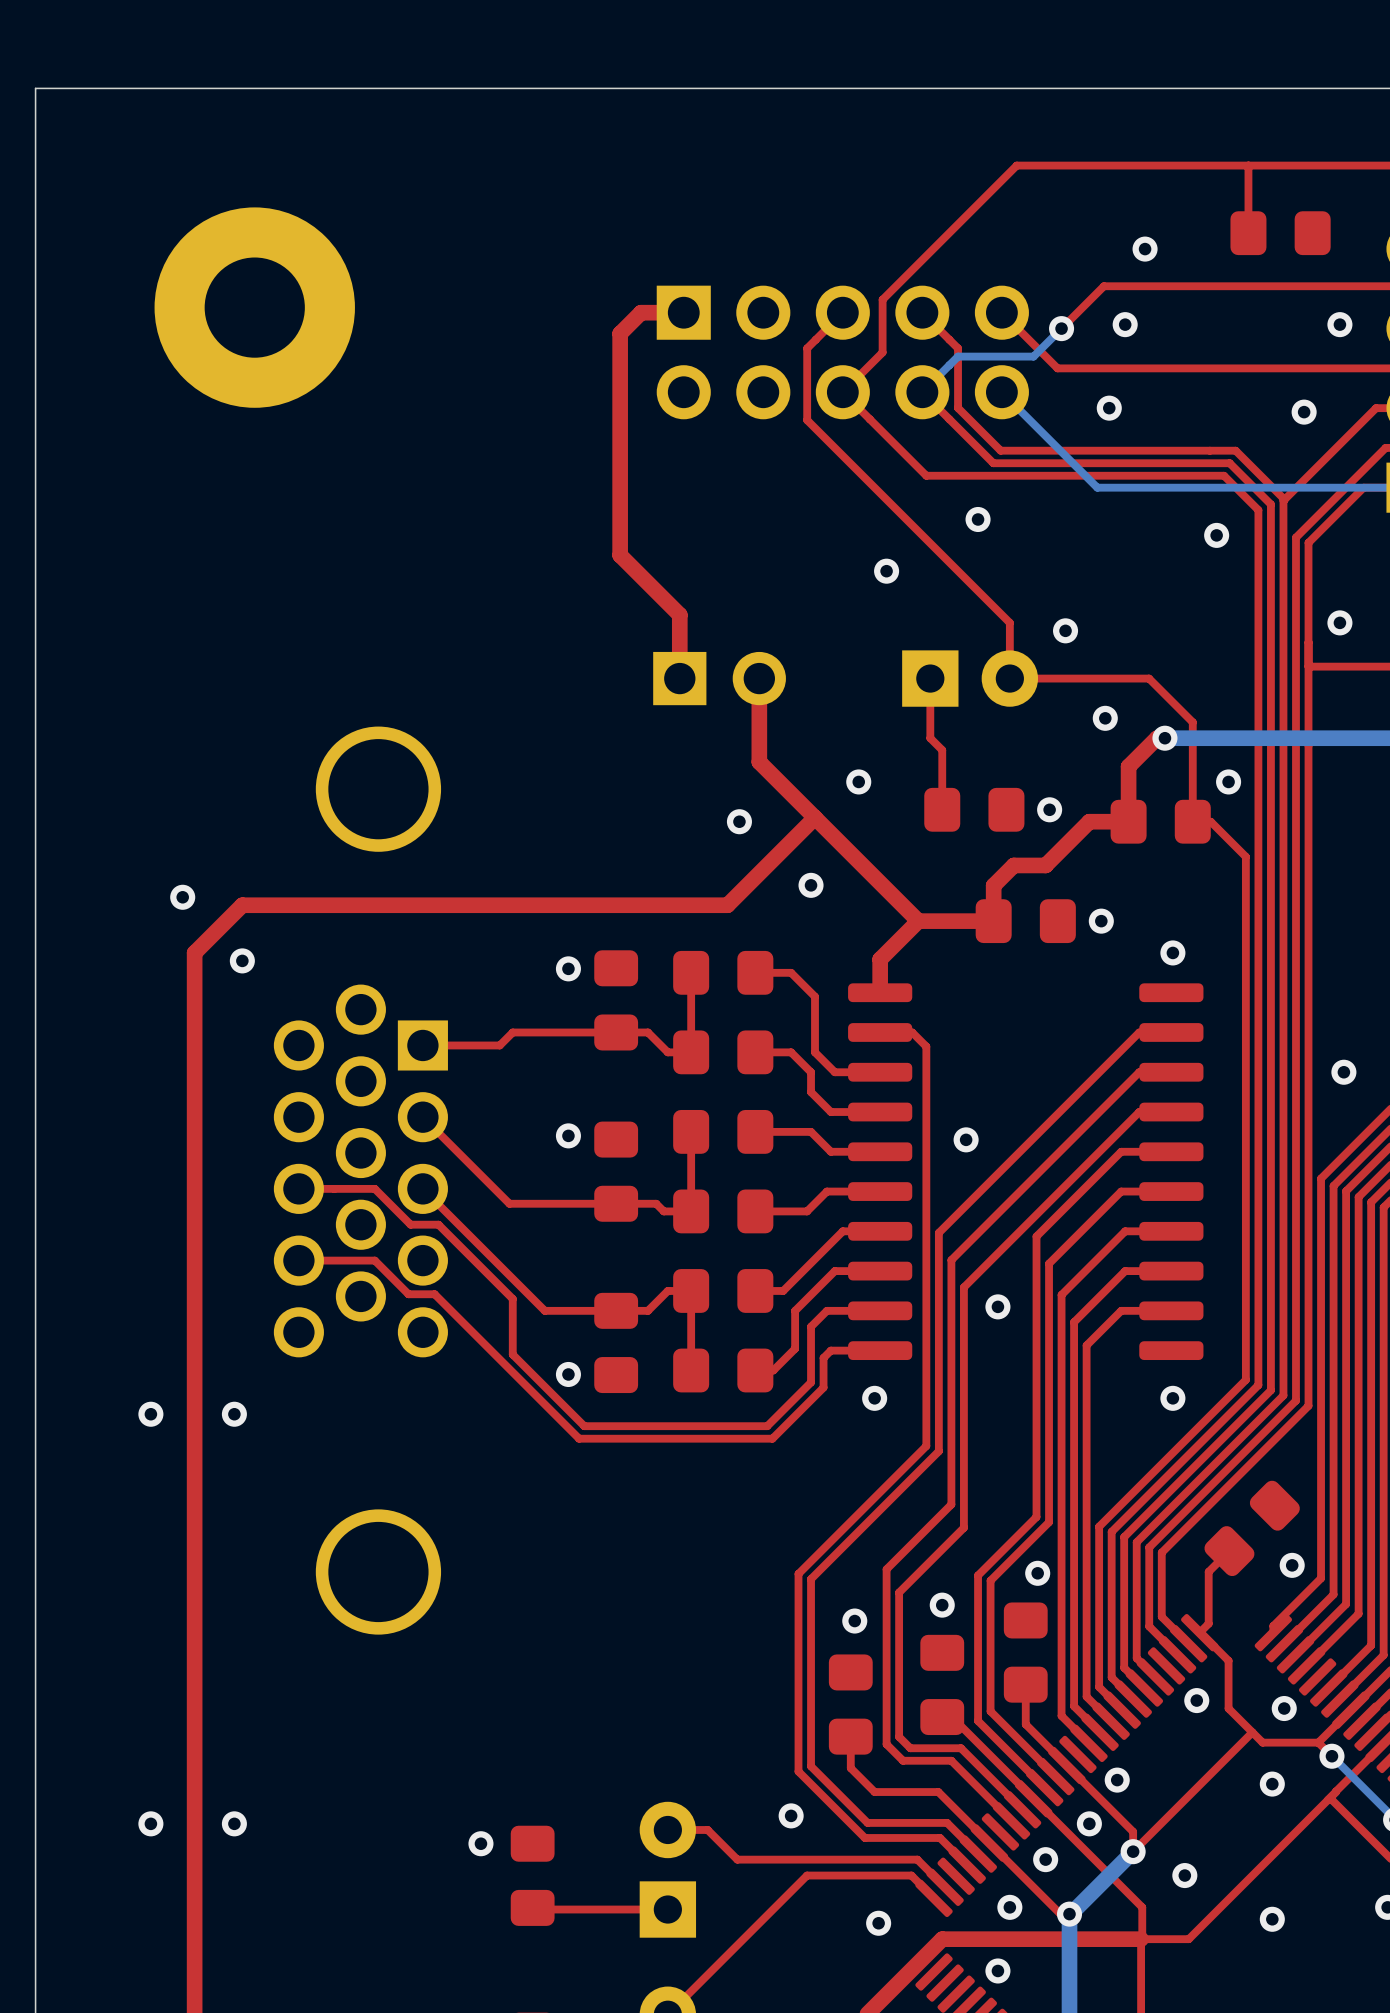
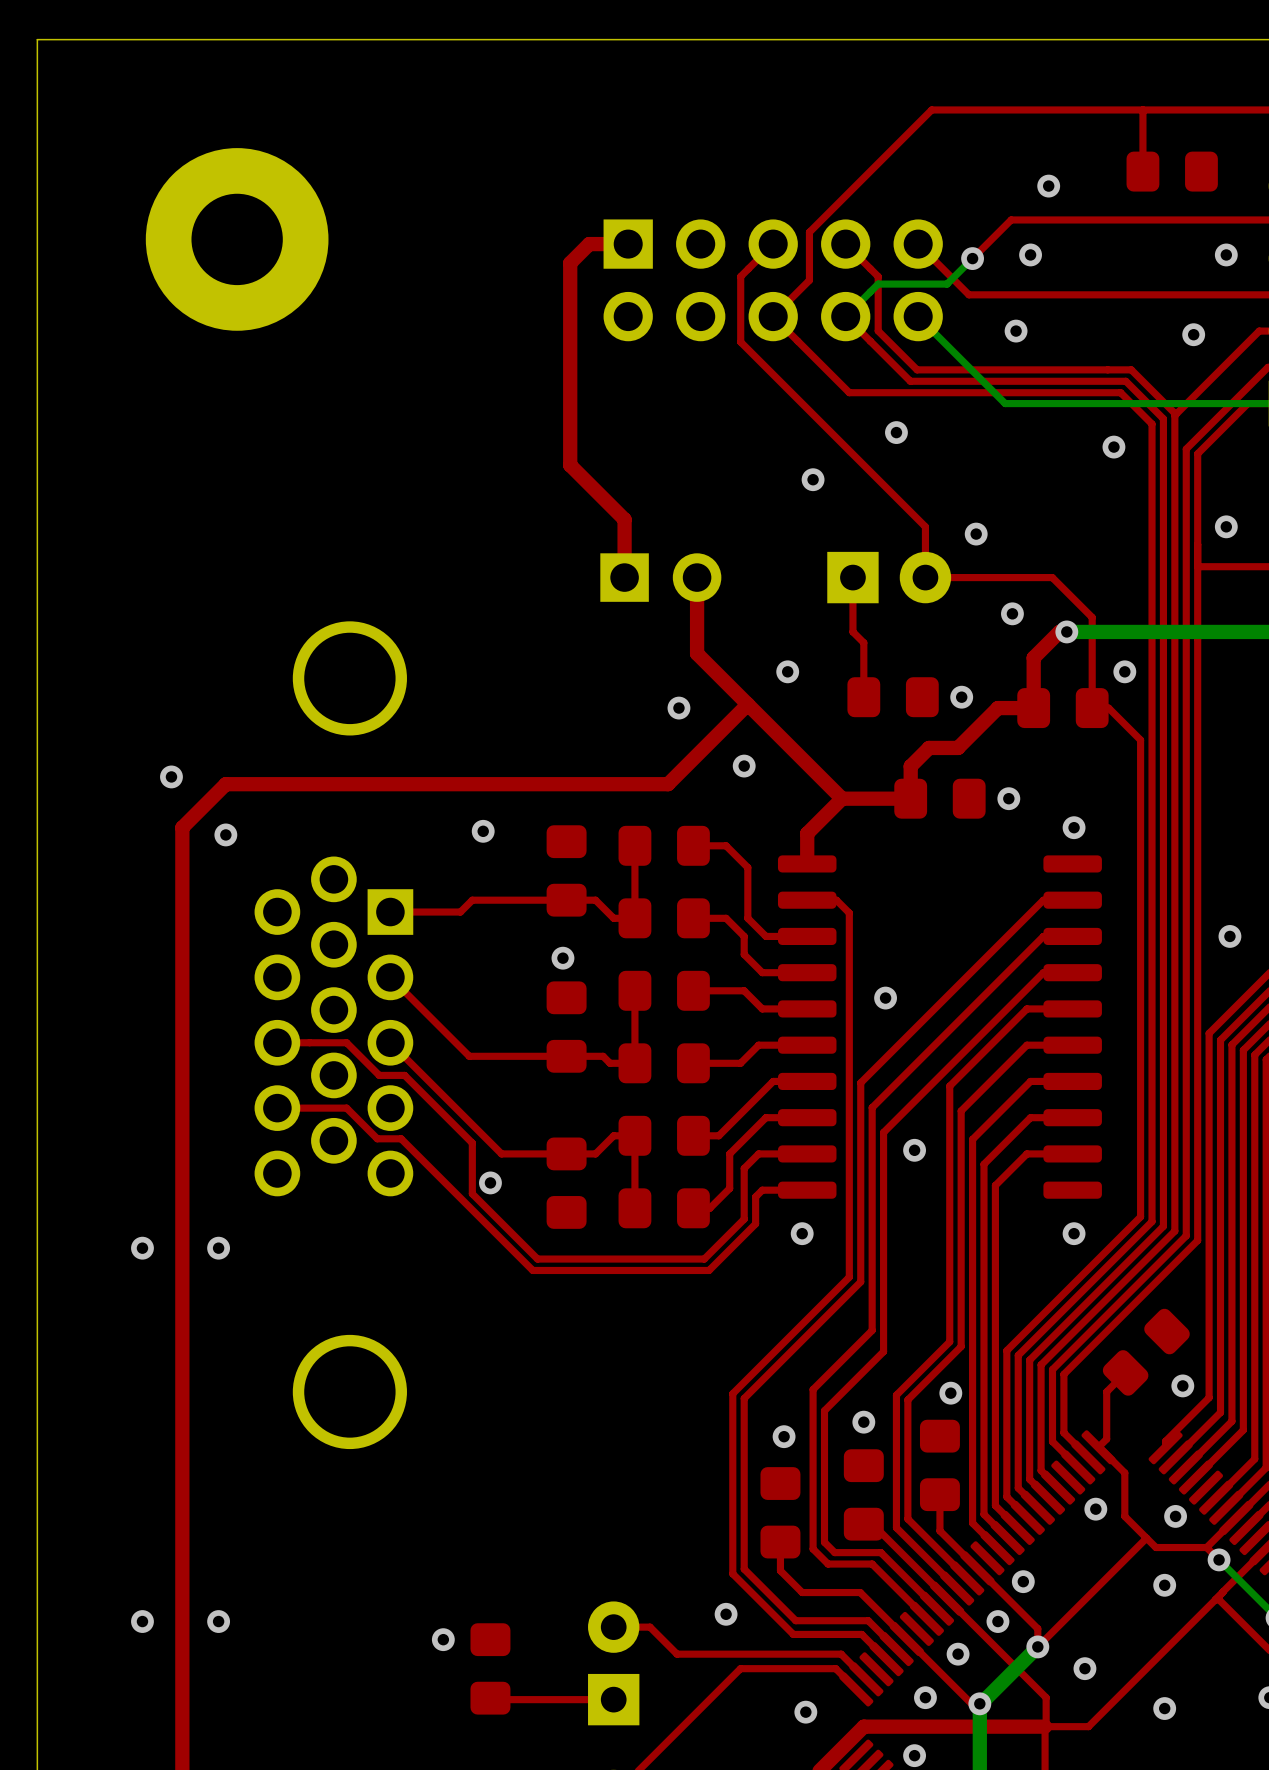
via position: (568, 968) -> (483, 831)
via position: (568, 1135) -> (562, 958)
via position: (568, 1374) -> (490, 1182)

